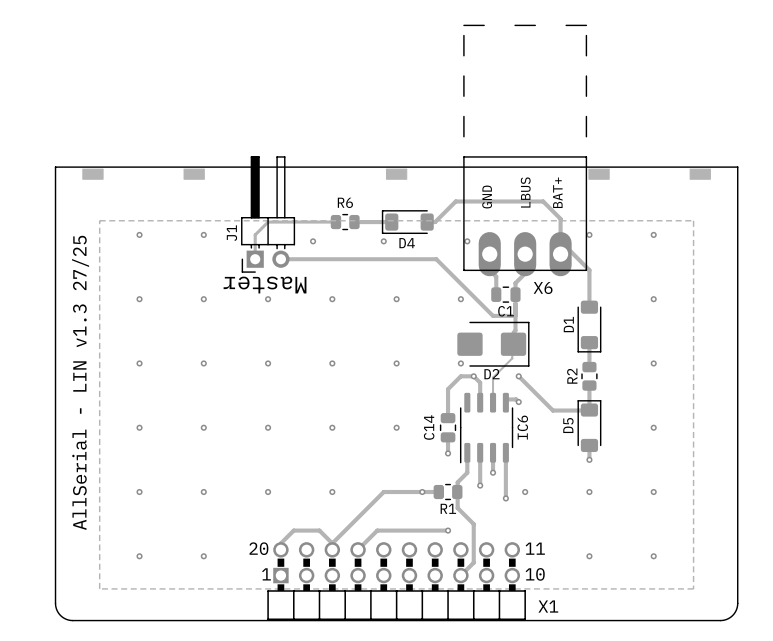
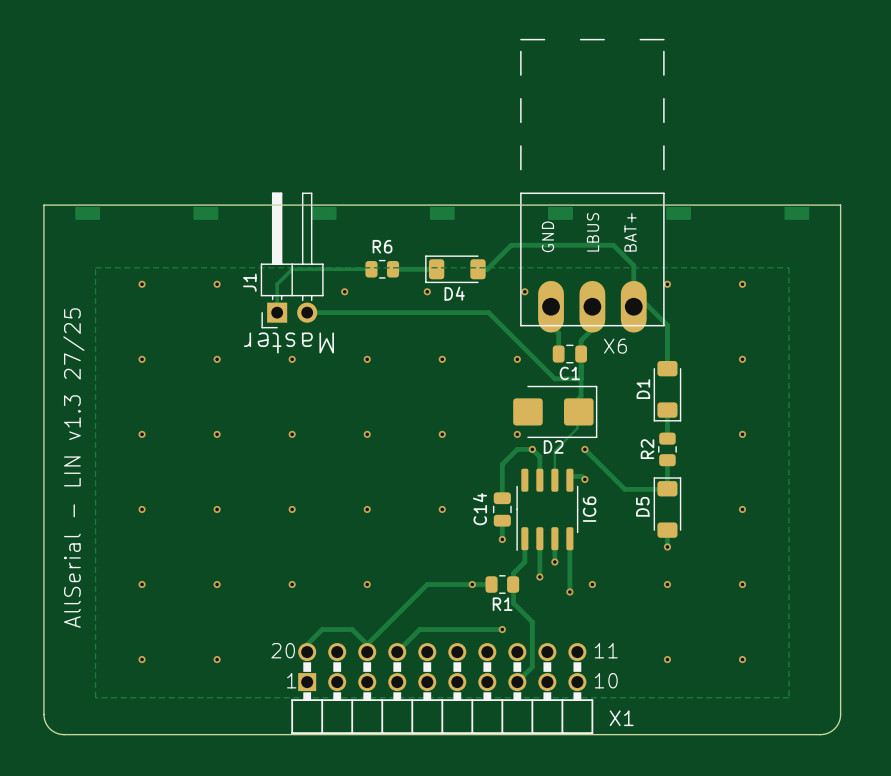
X1 footprint: [55, 166, 738, 621] -> [43, 204, 841, 735]

